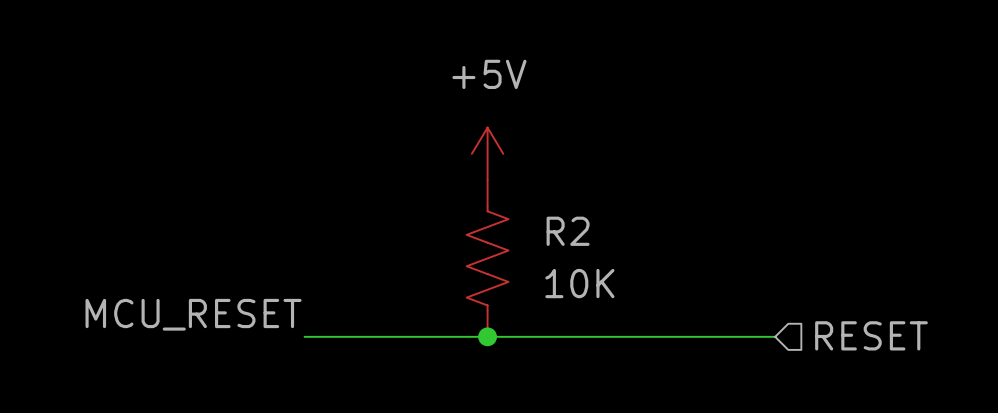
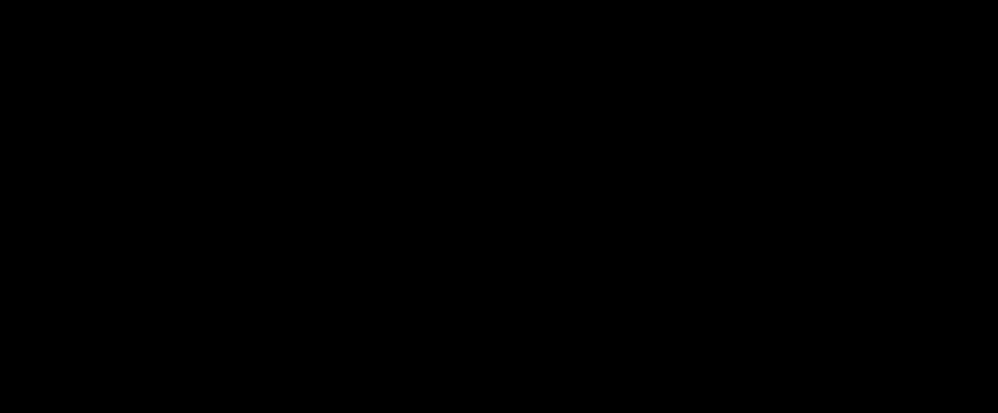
power symbol: +5V (487, 153) -> none
R2: 10K (487, 258) -> none
label: MCU_RESET (193, 314) -> none
hierarchical label: RESET (871, 335) -> none
wire: (304, 336) (775, 336) -> none
junction: (487, 336) -> none

